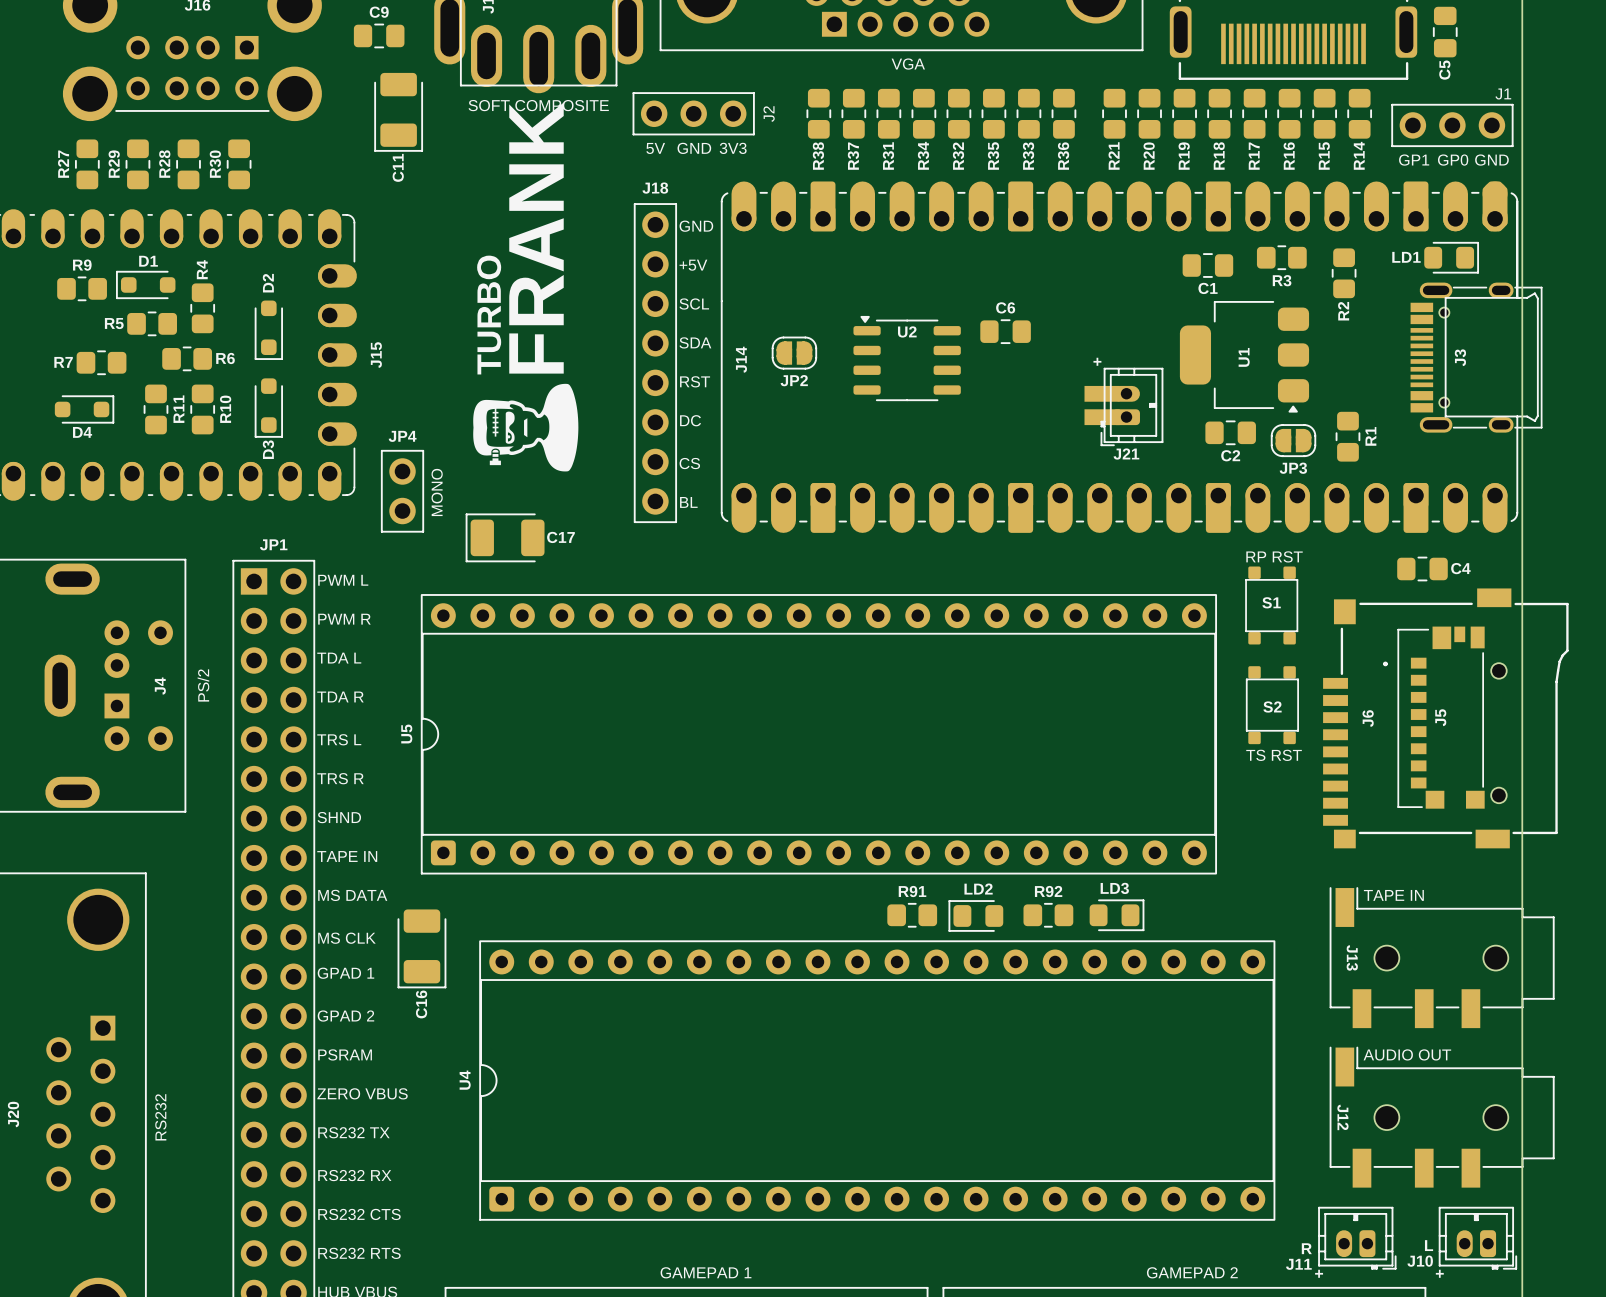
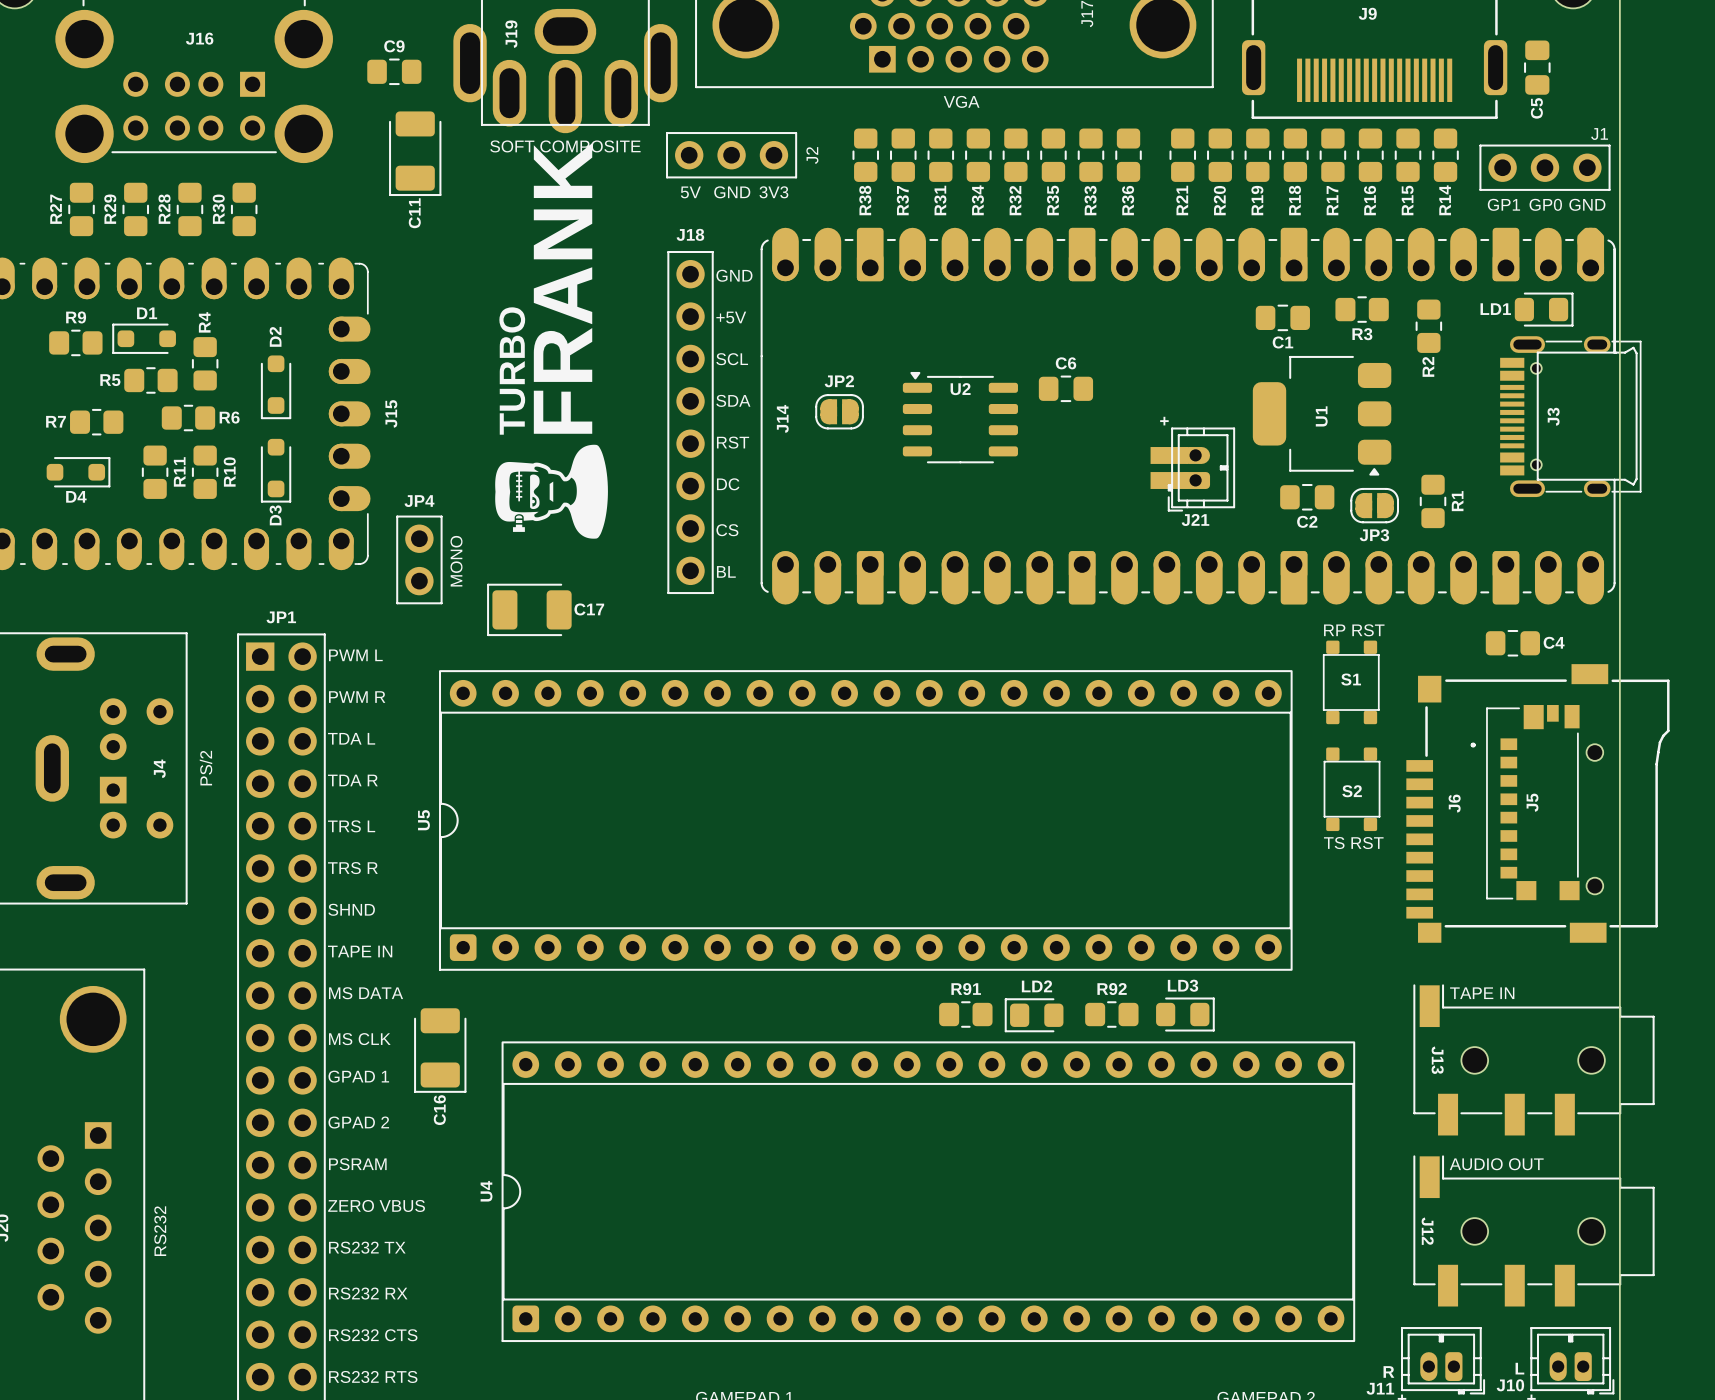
JP2 name position: JP2 (794, 380) -> JP2 (839, 381)

